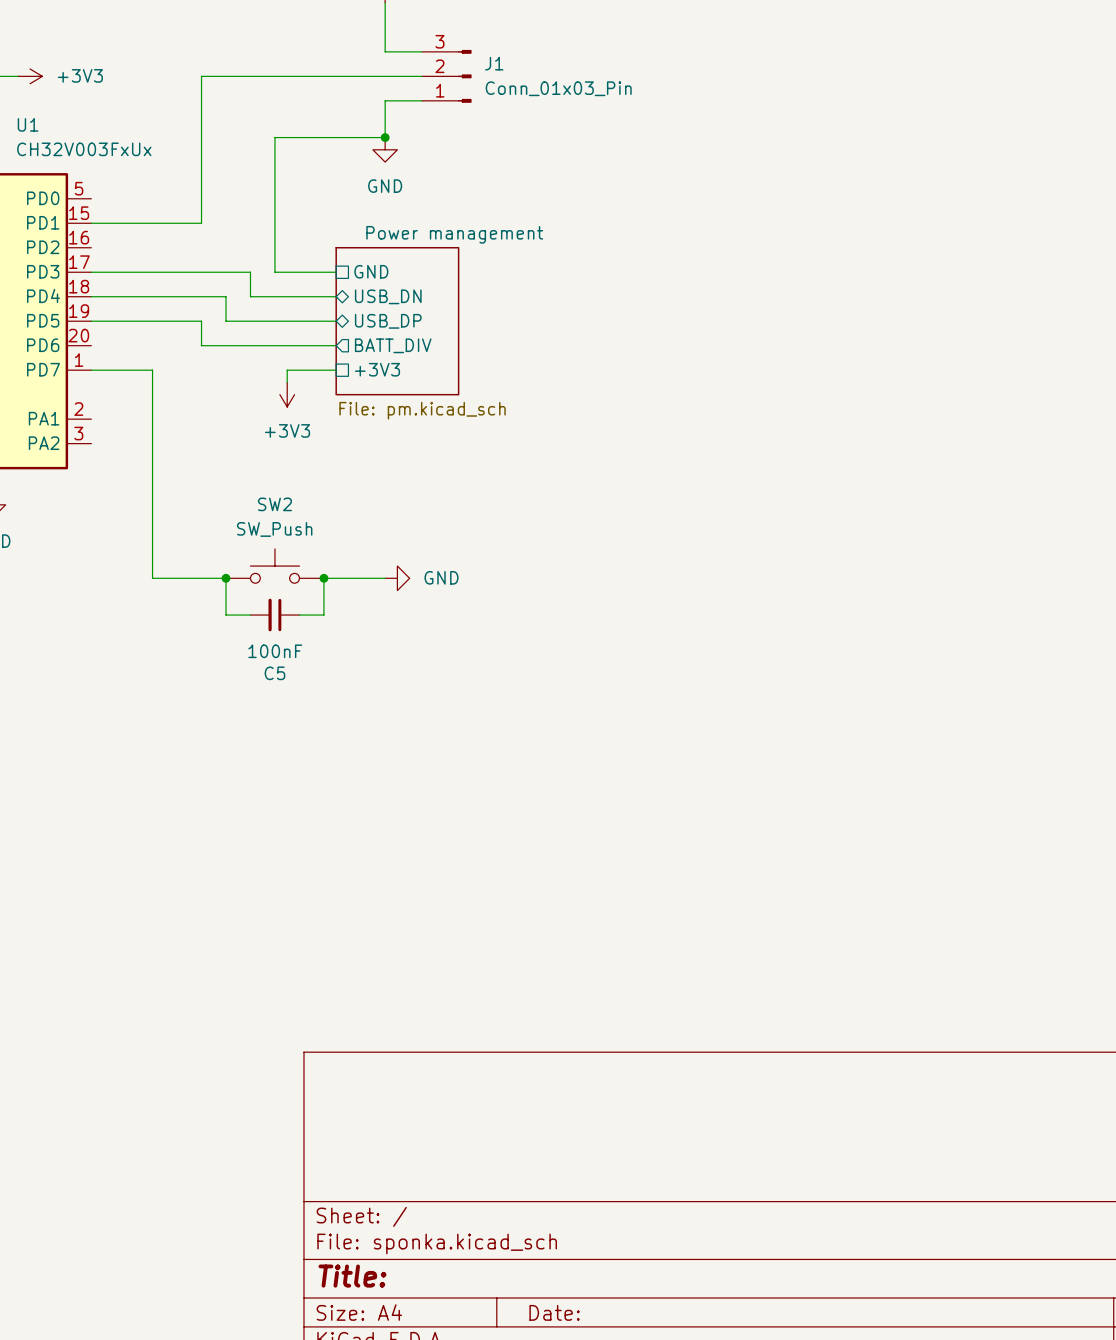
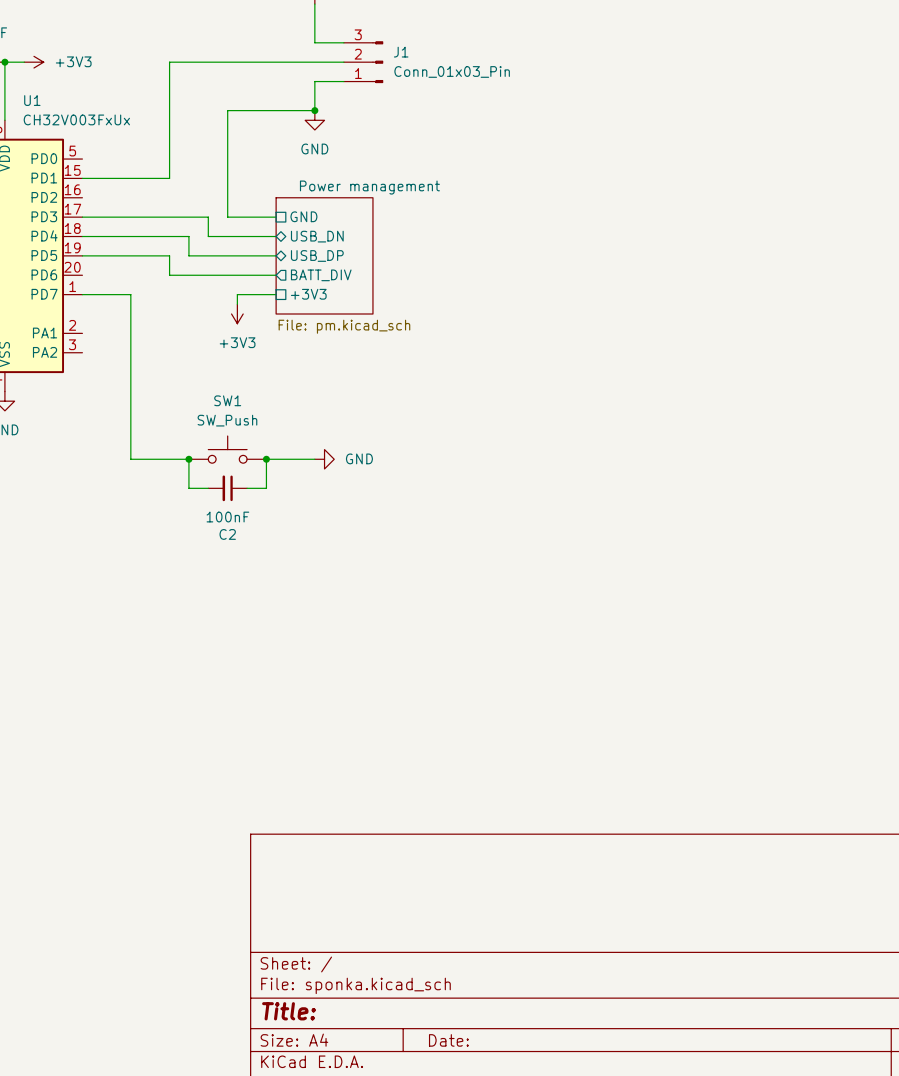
SW2 name: SW2 (274, 504) -> SW1 (227, 400)
C5 name: C5 (274, 673) -> C2 (227, 534)

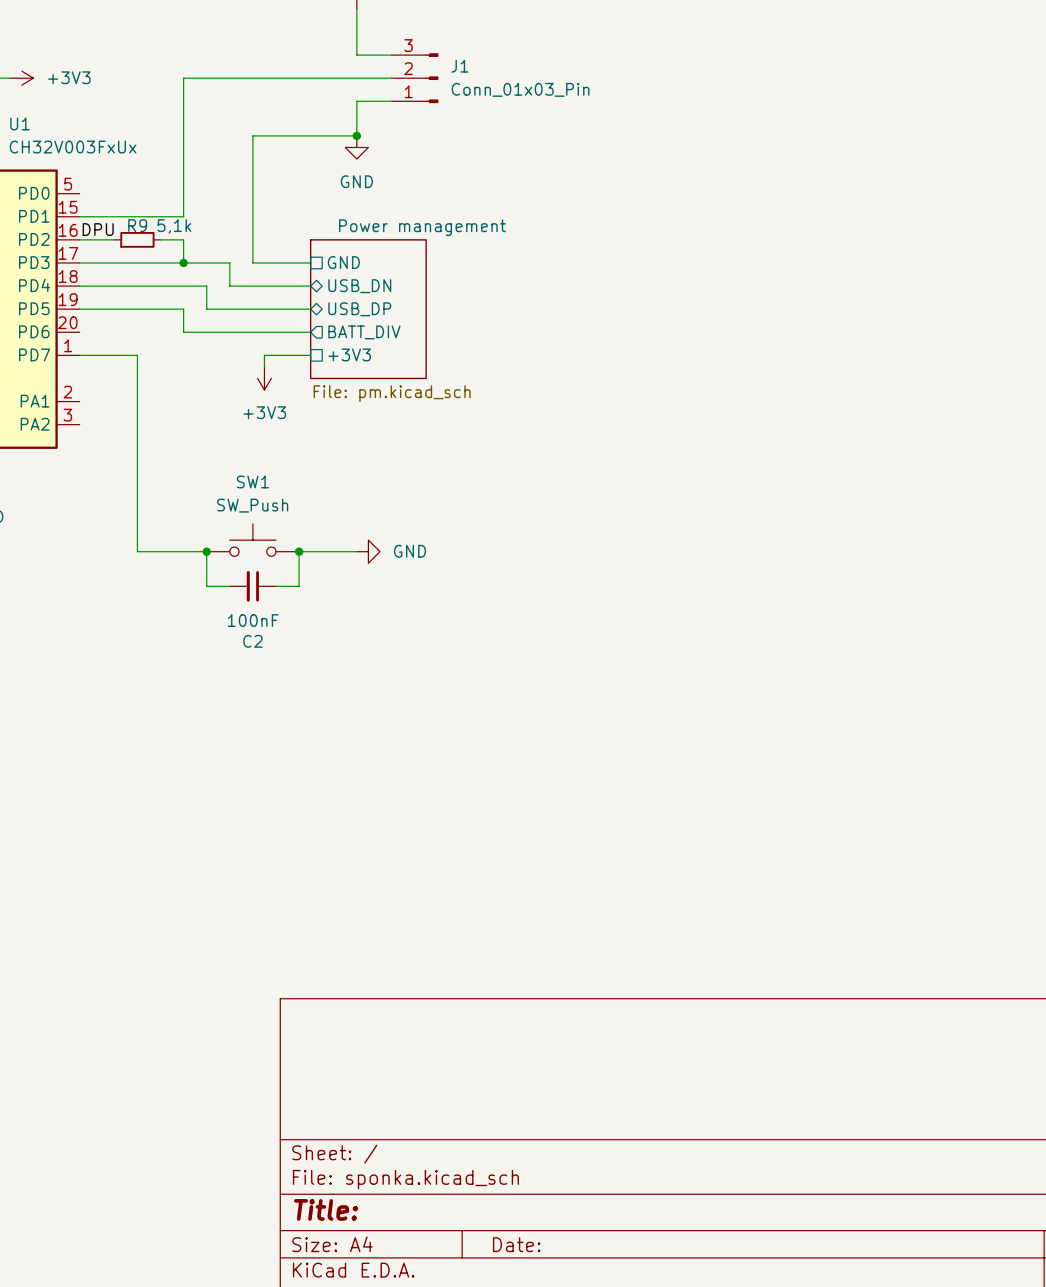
label: none -> DPU (98, 229)
wire: none -> (79, 239) (114, 239)
R9: none -> 5,1k (137, 239)
wire: none -> (160, 239) (183, 239) (183, 262)
junction: none -> (183, 262)

